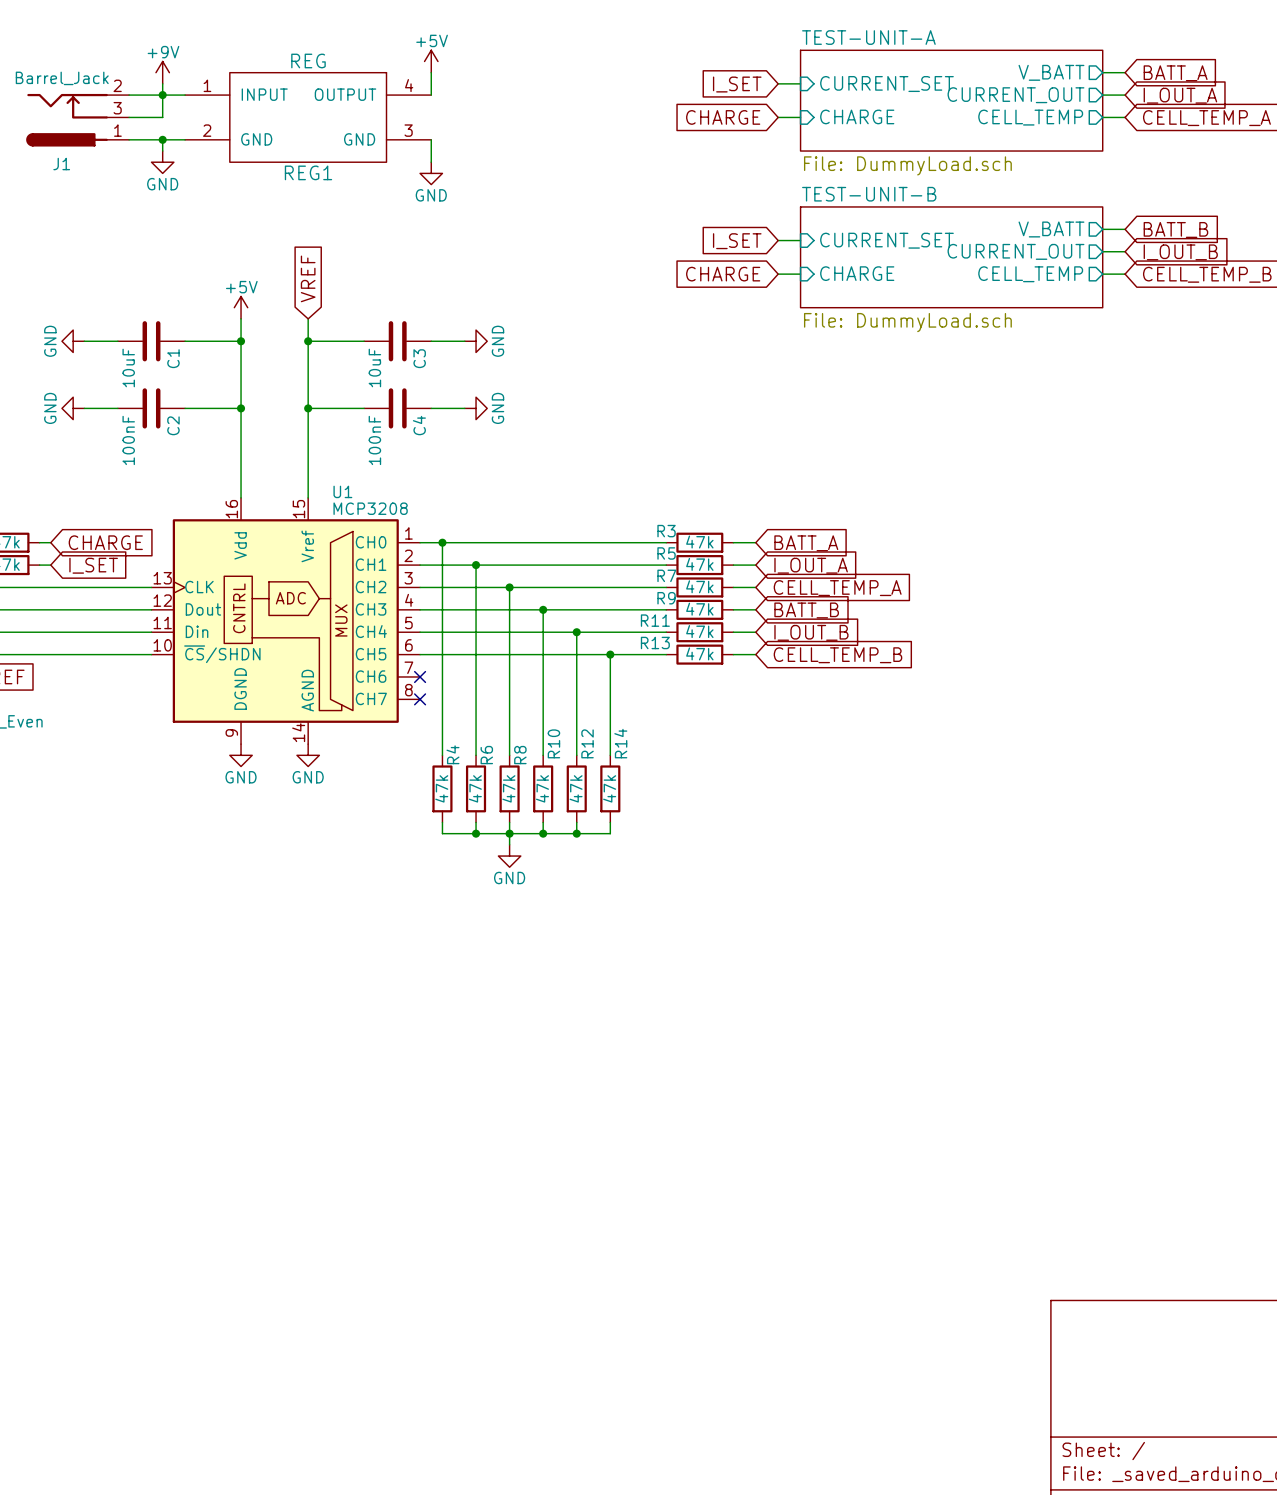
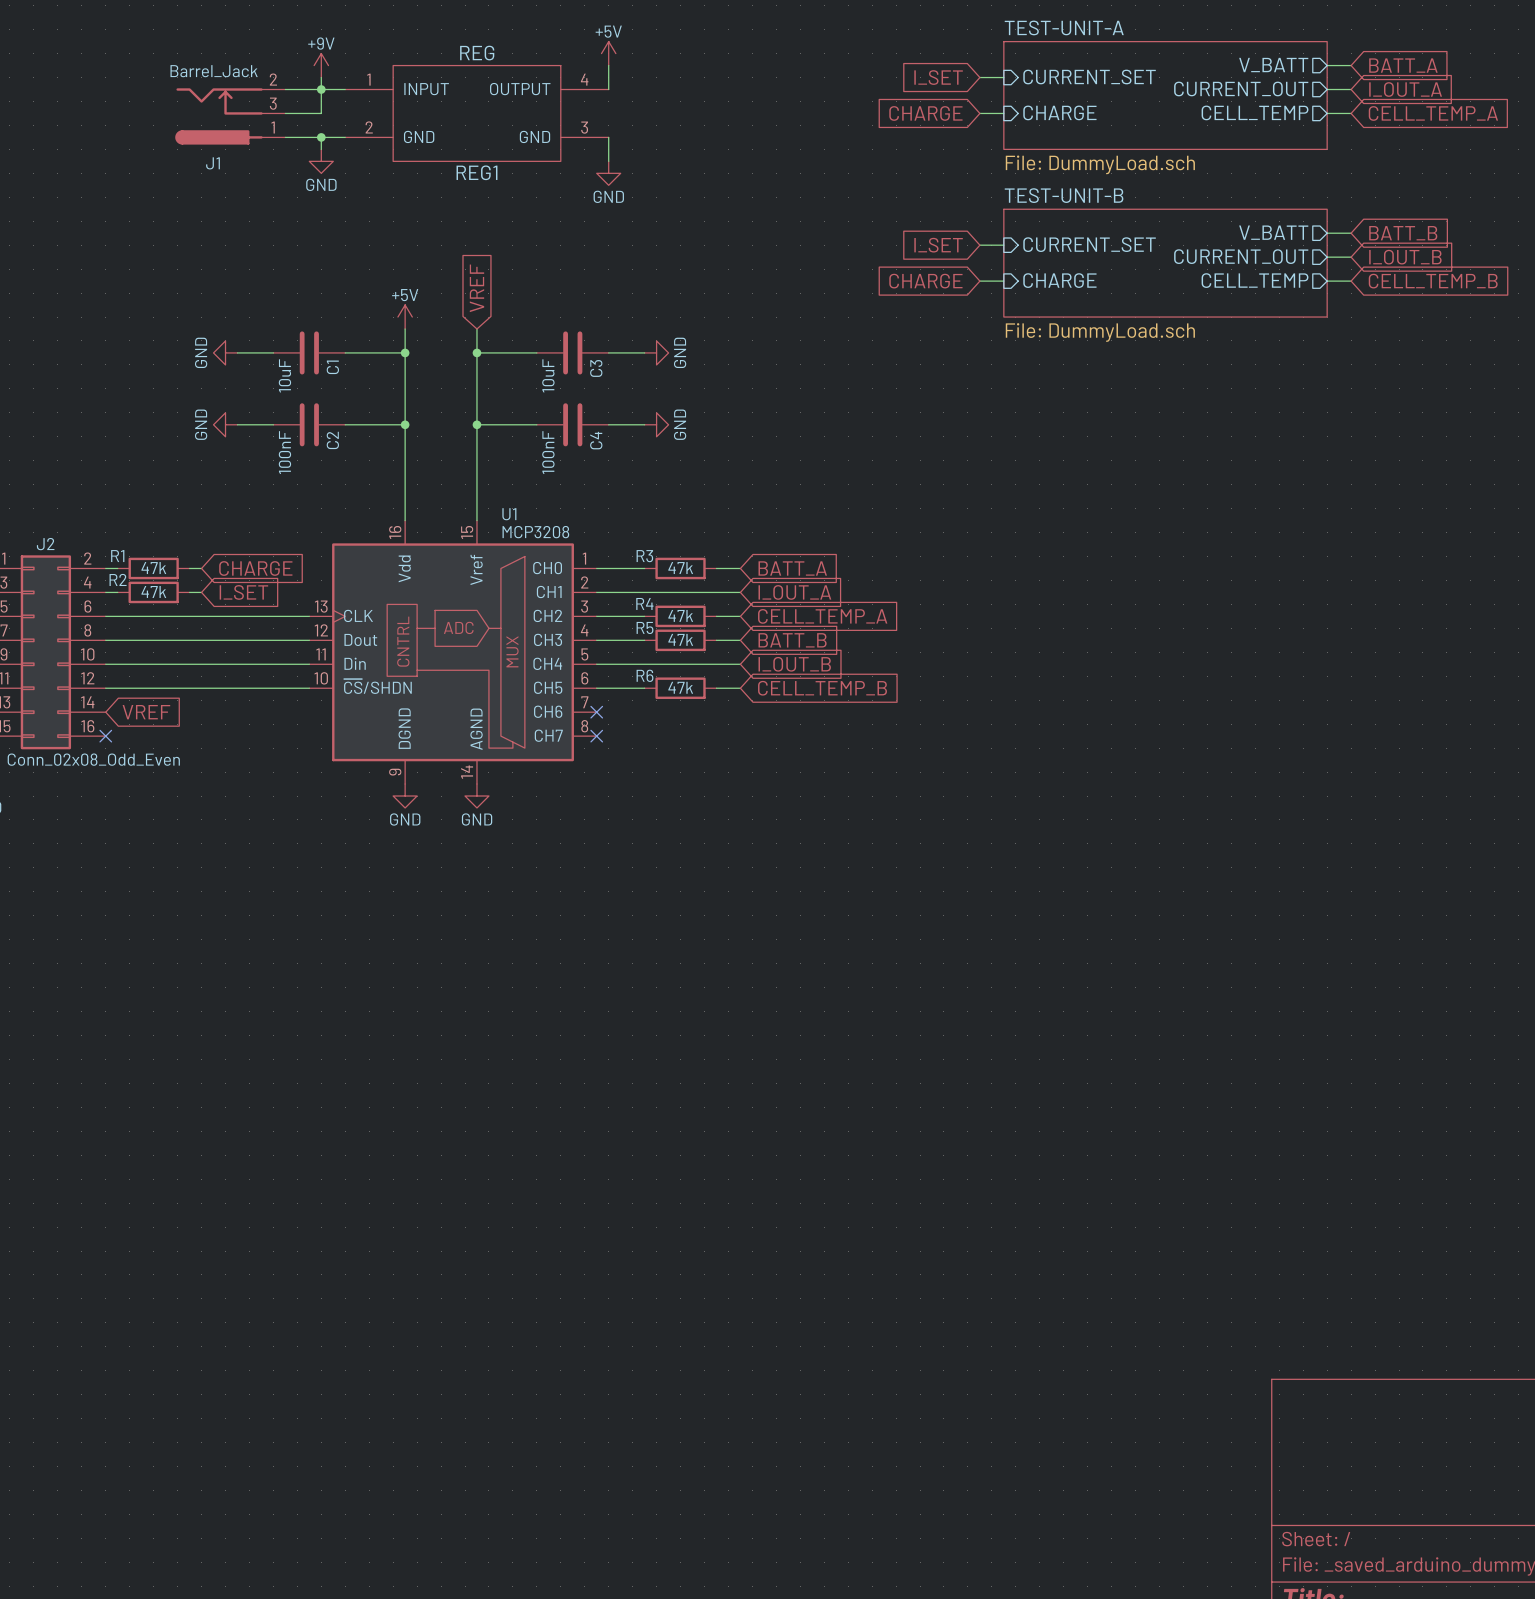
wire: (442, 542) (442, 755) -> none
junction: (442, 542) -> none
wire: (464, 542) (531, 542) -> none
wire: (554, 542) (666, 542) -> none
R3 position: (699, 542) -> (680, 568)
wire: (733, 542) (755, 542) -> none
global label position: BATT_A (806, 543) -> BATT_A (792, 568)
wire: (476, 565) (476, 755) -> none
junction: (476, 565) -> none
wire: (554, 565) (666, 565) -> none
R5 position: (699, 565) -> (680, 640)
wire: (733, 565) (755, 565) -> none
global label position: I_OUT_A (811, 565) -> I_OUT_A (794, 592)
wire: (464, 587) (531, 587) -> none
wire: (509, 587) (509, 755) -> none
junction: (509, 587) -> none
wire: (554, 587) (666, 587) -> none
R7: 47k (699, 587) -> none
wire: (733, 587) (755, 587) -> none
global label position: CELL_TEMP_A (837, 588) -> CELL_TEMP_A (822, 616)
wire: (464, 609) (531, 609) -> none
wire: (543, 609) (543, 755) -> none
junction: (543, 609) -> none
wire: (554, 609) (666, 609) -> none
R9: 47k (699, 609) -> none
wire: (733, 609) (755, 609) -> none
global label position: BATT_B (806, 610) -> BATT_B (792, 640)
wire: (554, 632) (666, 632) -> none
wire: (576, 632) (576, 755) -> none
junction: (576, 632) -> none
R11: 47k (699, 632) -> none
wire: (733, 632) (755, 632) -> none
global label position: I_OUT_B (811, 632) -> I_OUT_B (794, 664)
wire: (464, 654) (531, 654) -> none
wire: (554, 654) (666, 654) -> none
wire: (610, 654) (610, 755) -> none
junction: (610, 654) -> none
R13: 47k (699, 654) -> none
wire: (733, 654) (755, 654) -> none
global label position: CELL_TEMP_B (837, 655) -> CELL_TEMP_B (822, 688)
R4 name position: R4 (452, 754) -> R4 (644, 603)
R6 name position: R6 (486, 755) -> R6 (644, 675)
R4 rotation: 0° (442, 788) -> 90° clockwise (680, 616)
R4 position: (442, 788) -> (680, 616)
R6 rotation: 0° (476, 788) -> 90° clockwise (680, 688)
R6 position: (476, 788) -> (680, 688)
R8: 47k (509, 788) -> none
R10: 47k (543, 788) -> none
R12: 47k (576, 788) -> none
R14: 47k (610, 788) -> none
wire: (442, 822) (442, 833) (610, 833) (610, 822) -> none
wire: (476, 822) (476, 833) -> none
wire: (509, 822) (509, 844) -> none
wire: (543, 822) (543, 833) -> none
wire: (576, 822) (576, 833) -> none
junction: (476, 833) -> none
junction: (509, 833) -> none
junction: (543, 833) -> none
junction: (576, 833) -> none
power symbol: GND (509, 856) -> none

